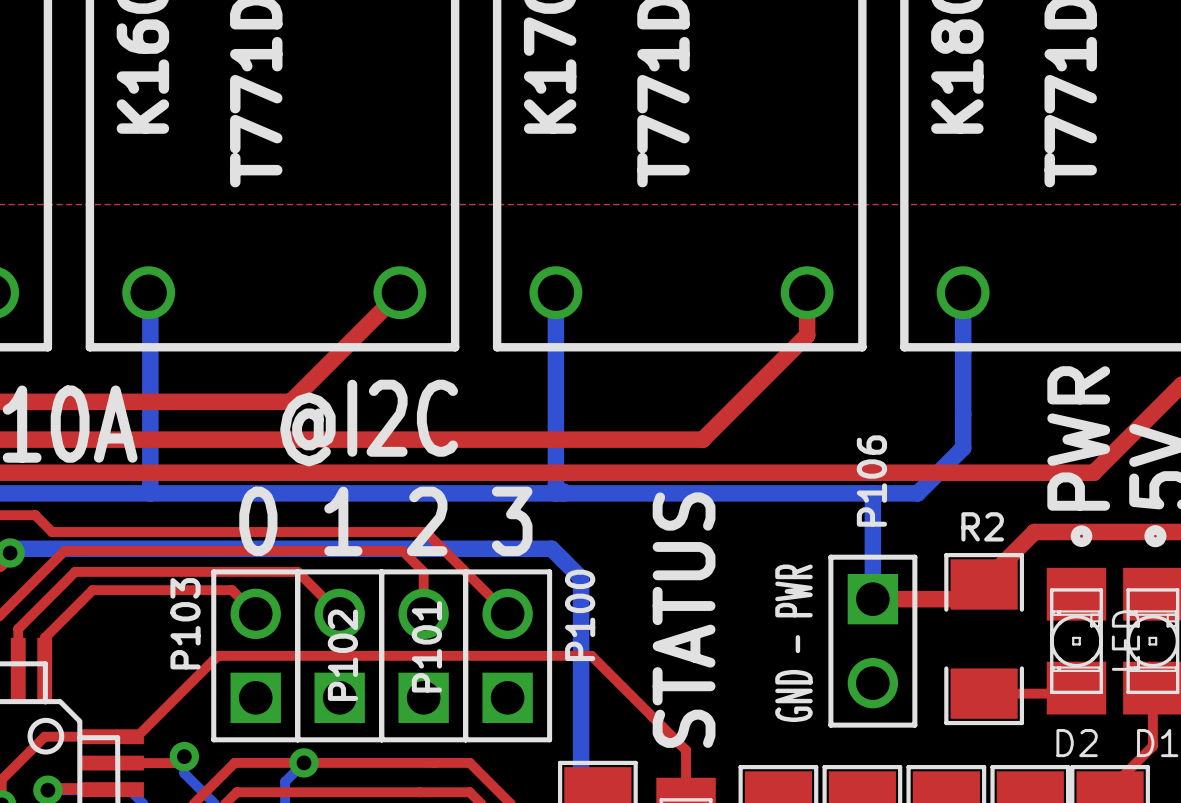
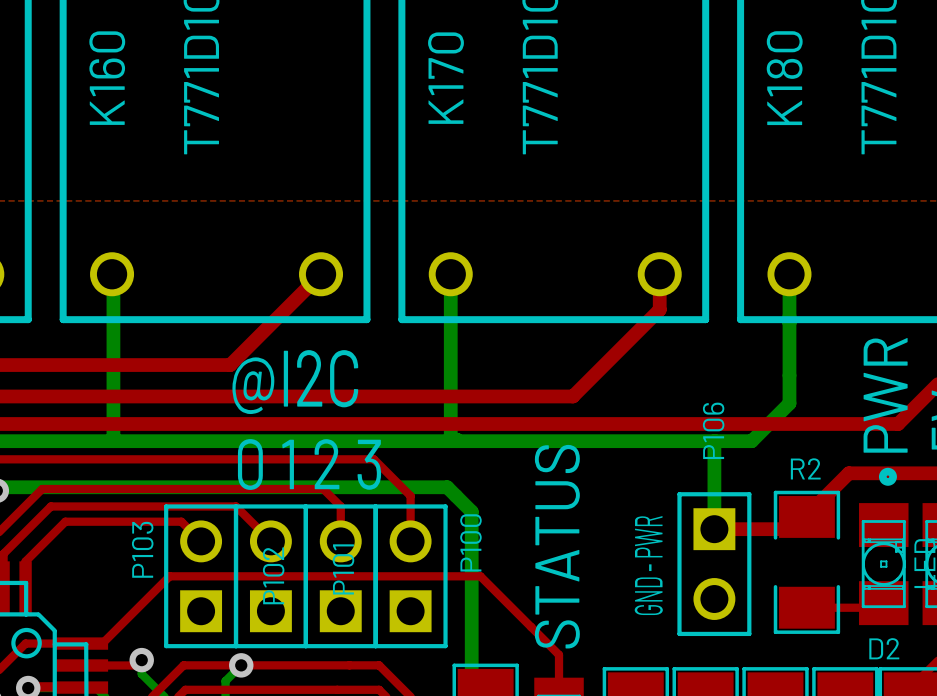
top track: (35, 515) (52, 532) (425, 532) (507, 613) -> (17, 459) (373, 459) (410, 496) (410, 541)

